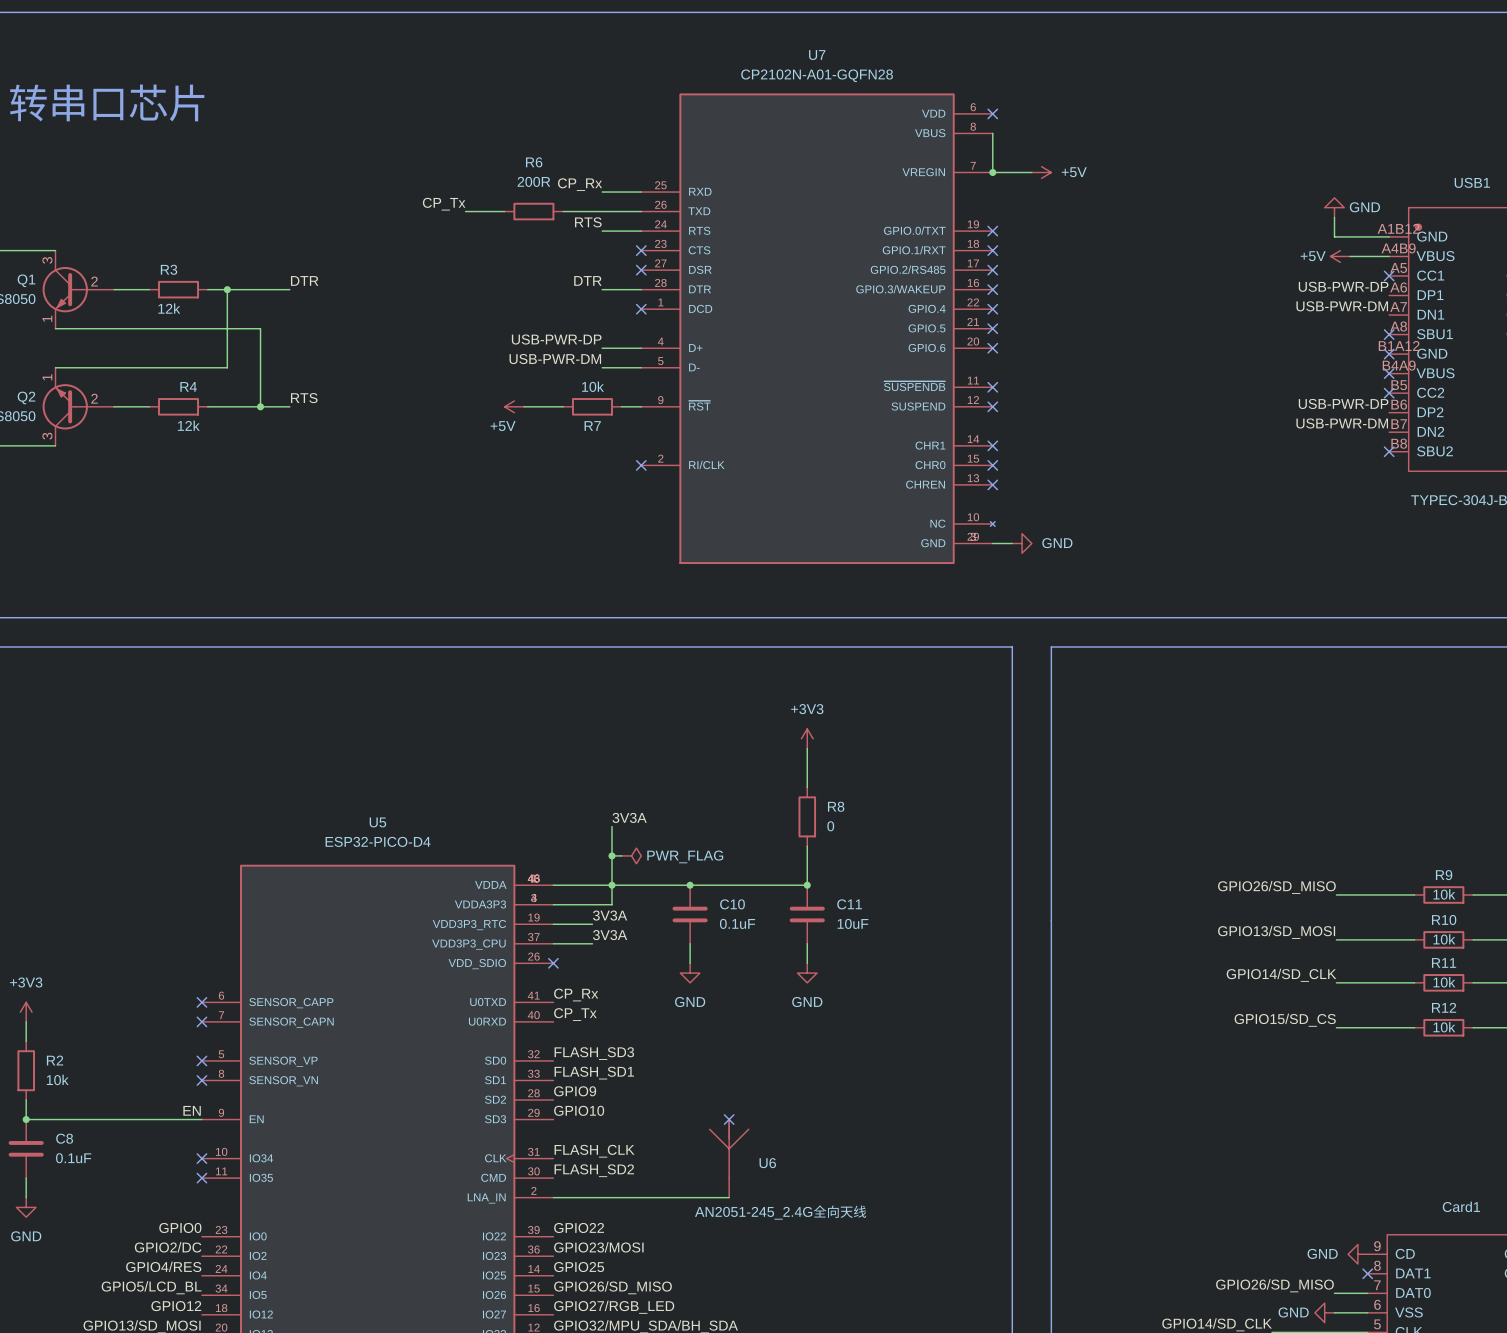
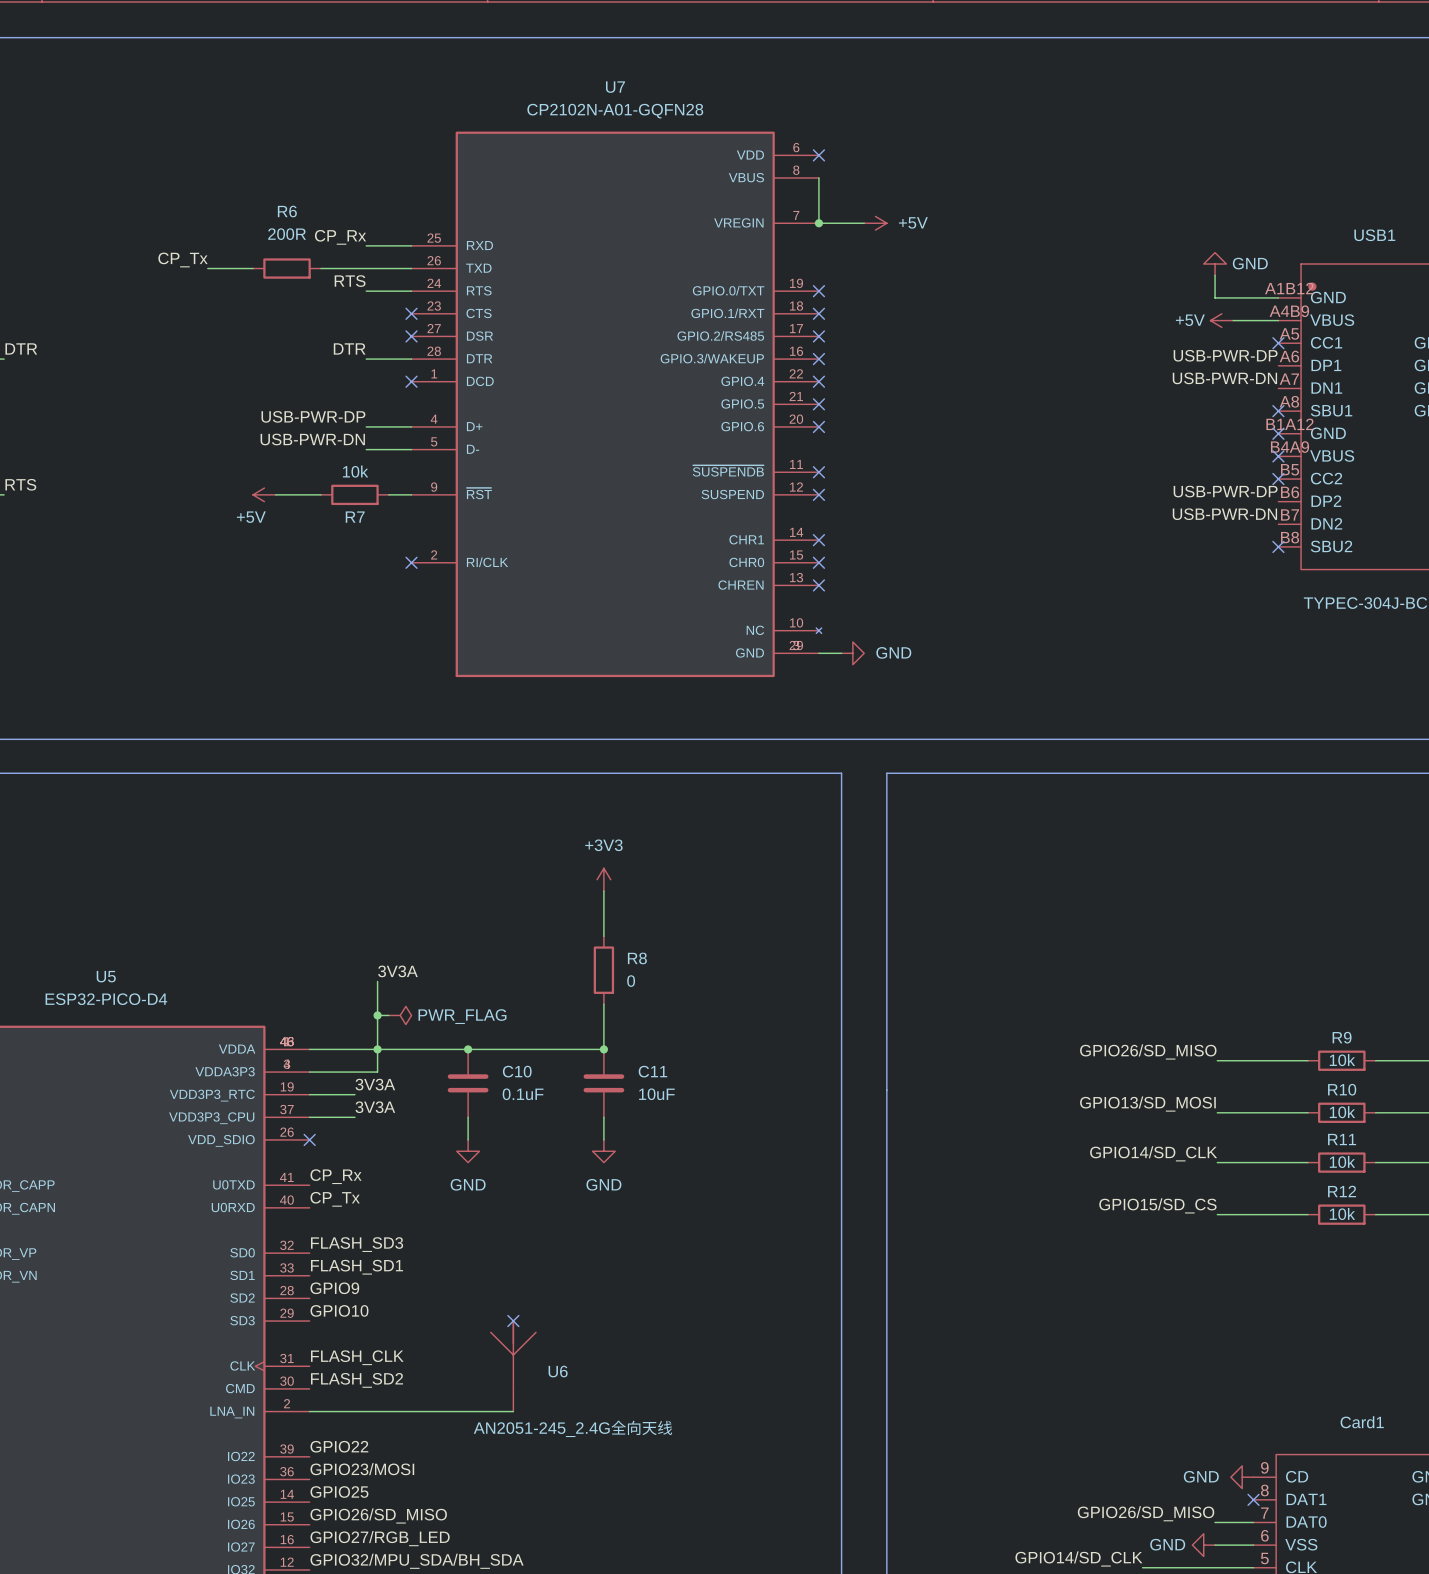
label: USB-PWR-DM (1342, 306) -> USB-PWR-DN (1224, 378)
label: USB-PWR-DM (555, 359) -> USB-PWR-DN (312, 439)
label: USB-PWR-DM (1342, 423) -> USB-PWR-DN (1224, 514)

